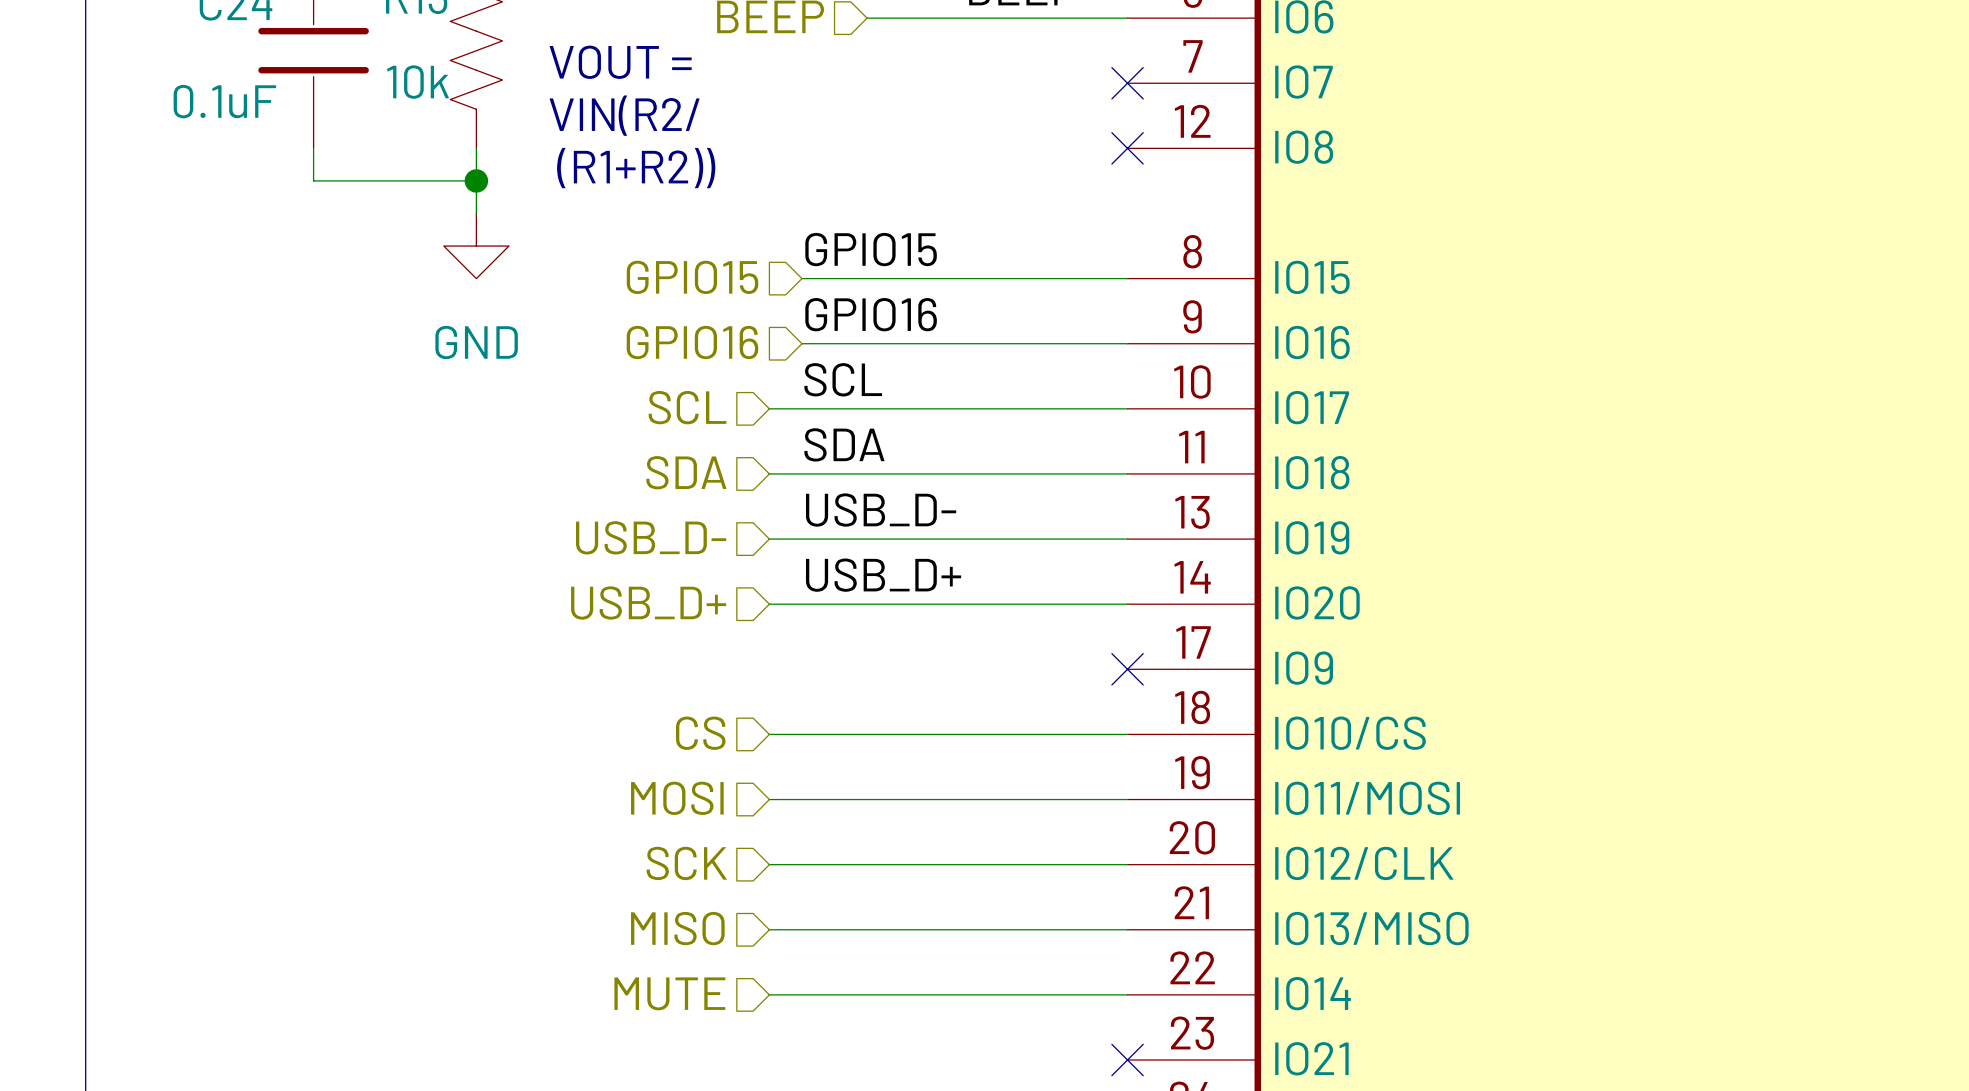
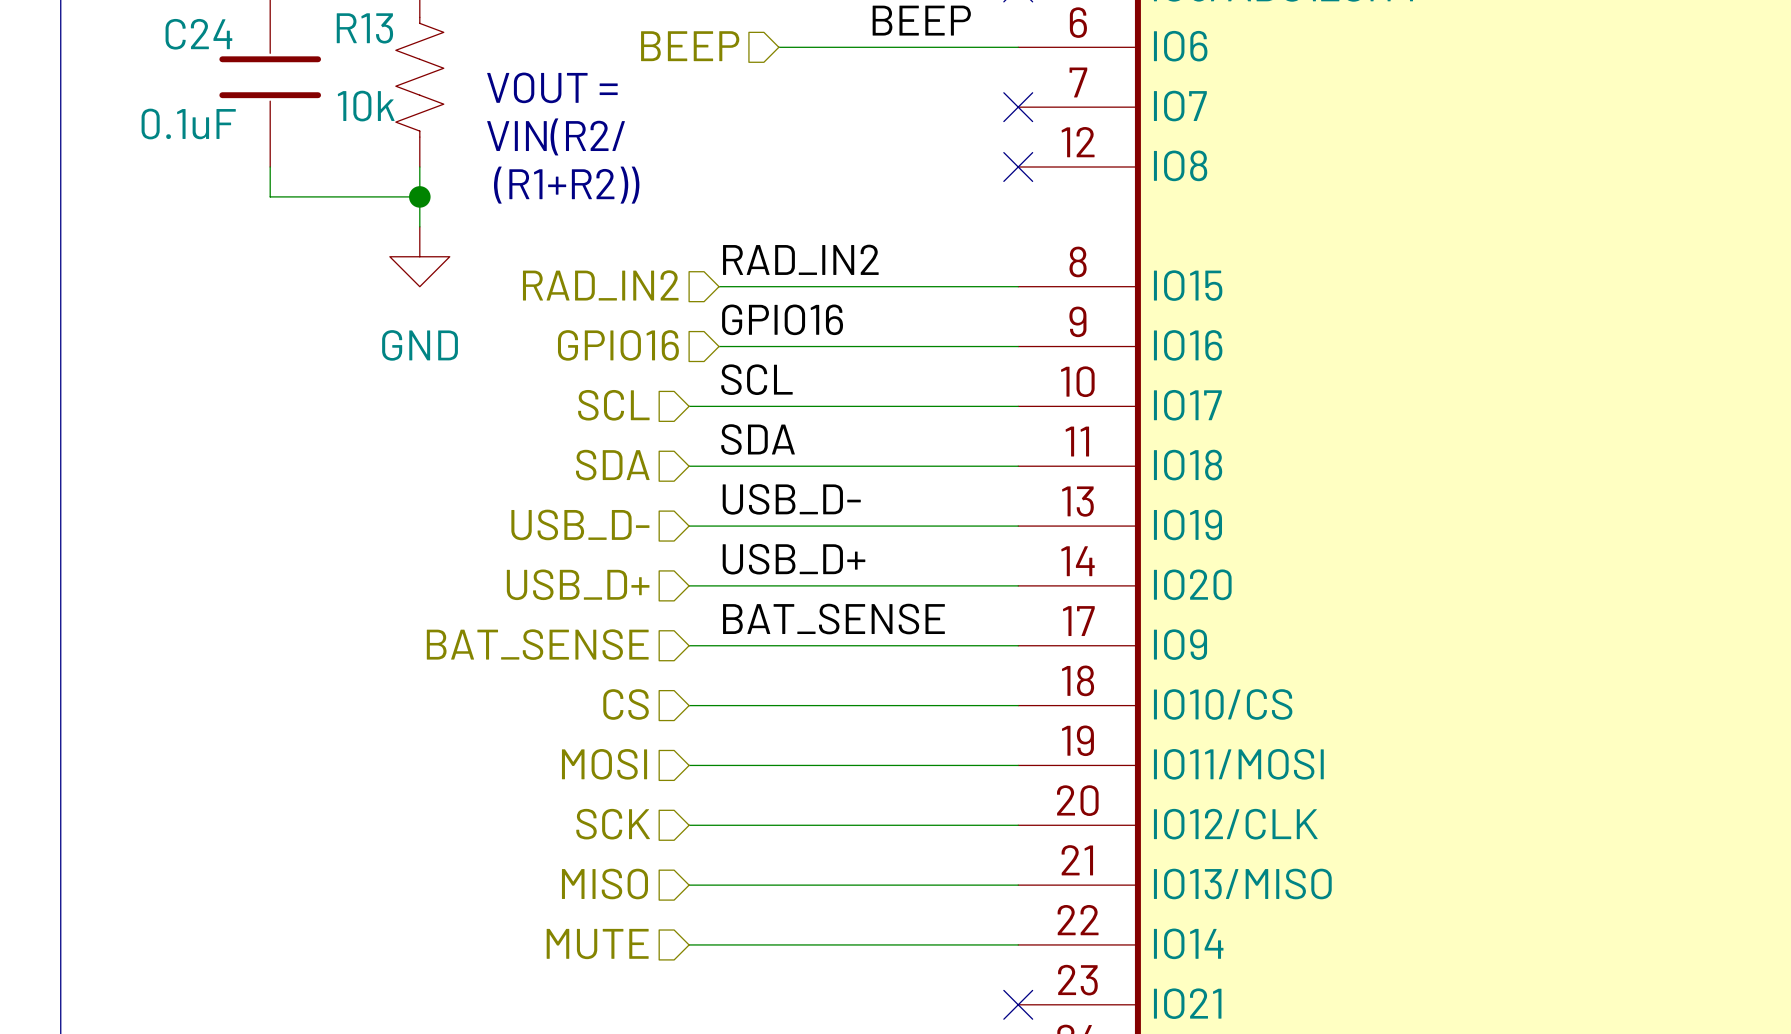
label: GPIO15 (871, 249) -> RAD_IN2 (800, 259)
hierarchical label: GPIO15 (692, 277) -> RAD_IN2 (600, 285)
label: none -> BAT_SENSE (833, 619)
hierarchical label: none -> BAT_SENSE (537, 644)
wire: none -> (689, 645) (1018, 645)
no-connect mark: (1127, 669) -> none

